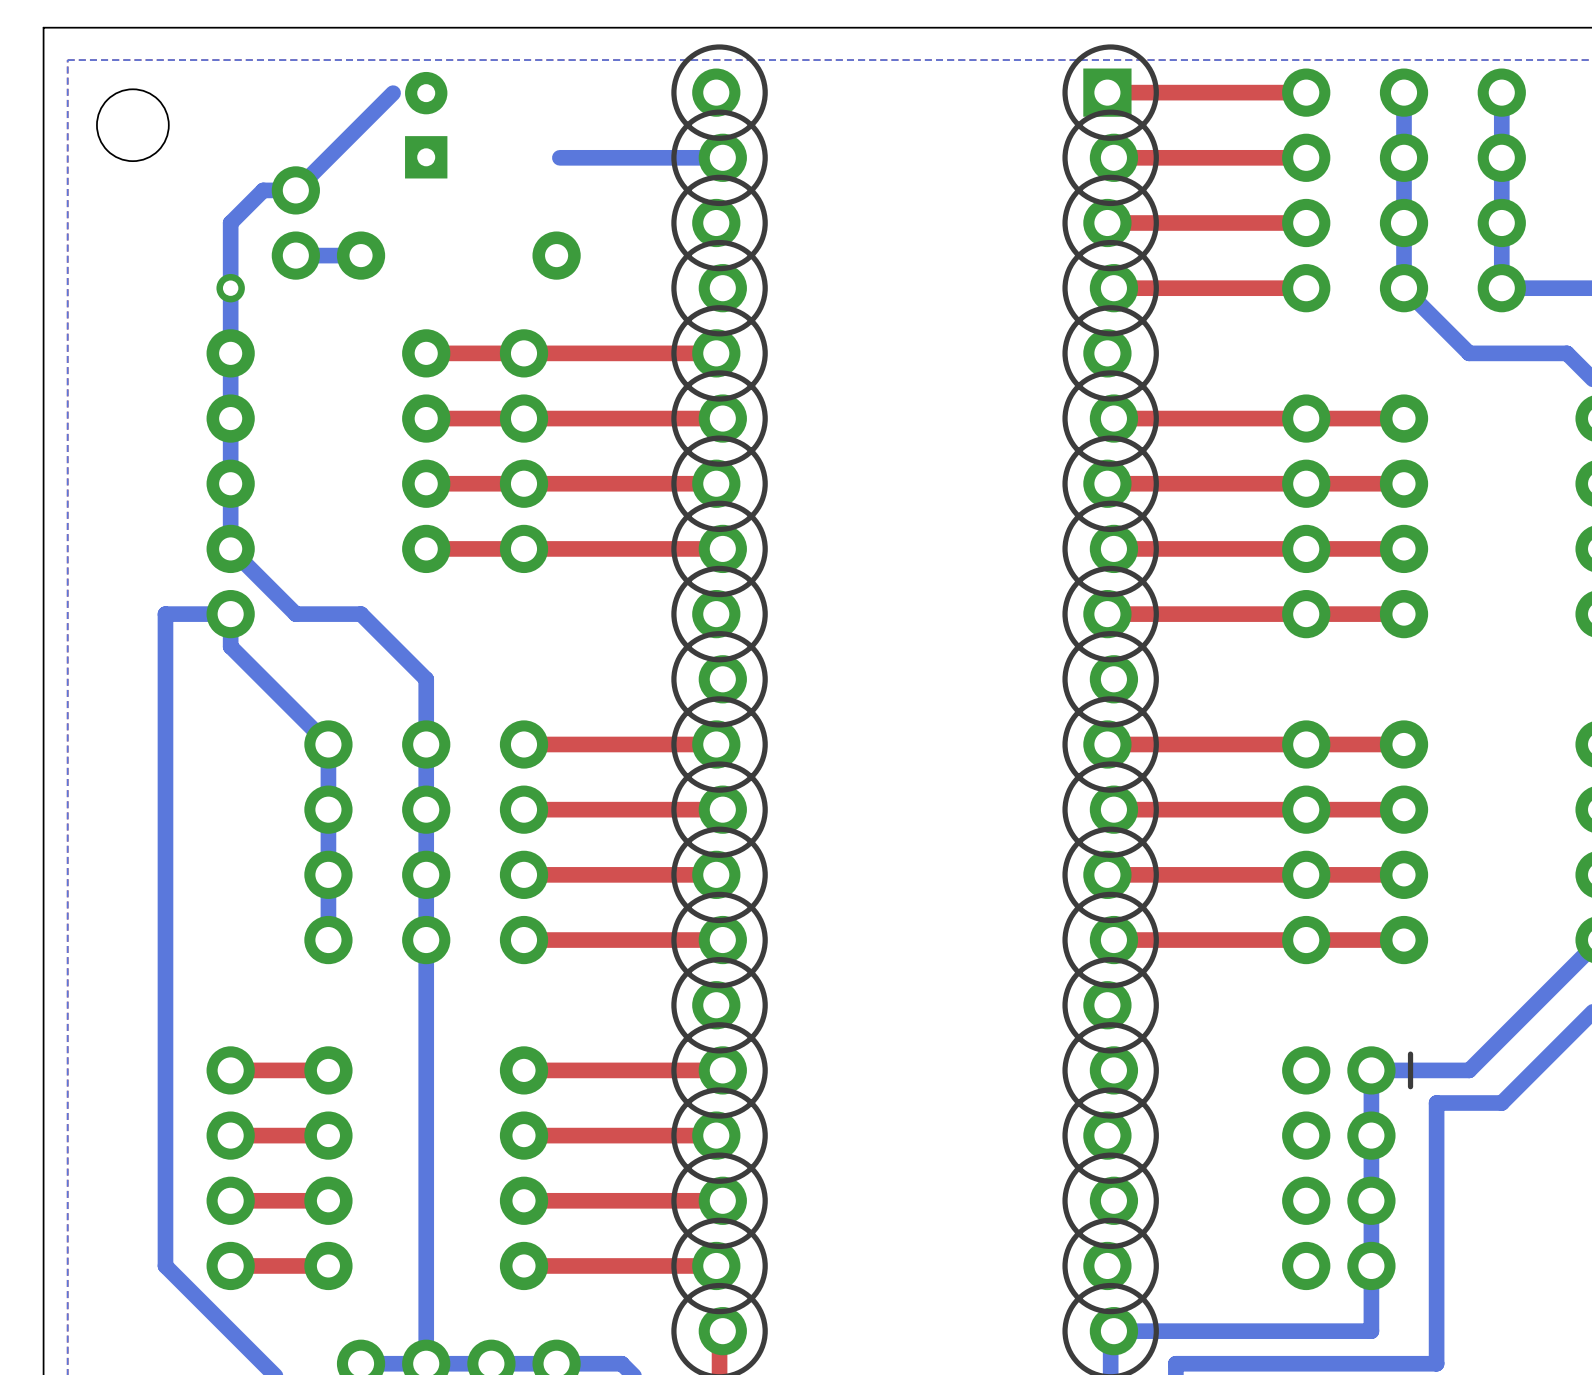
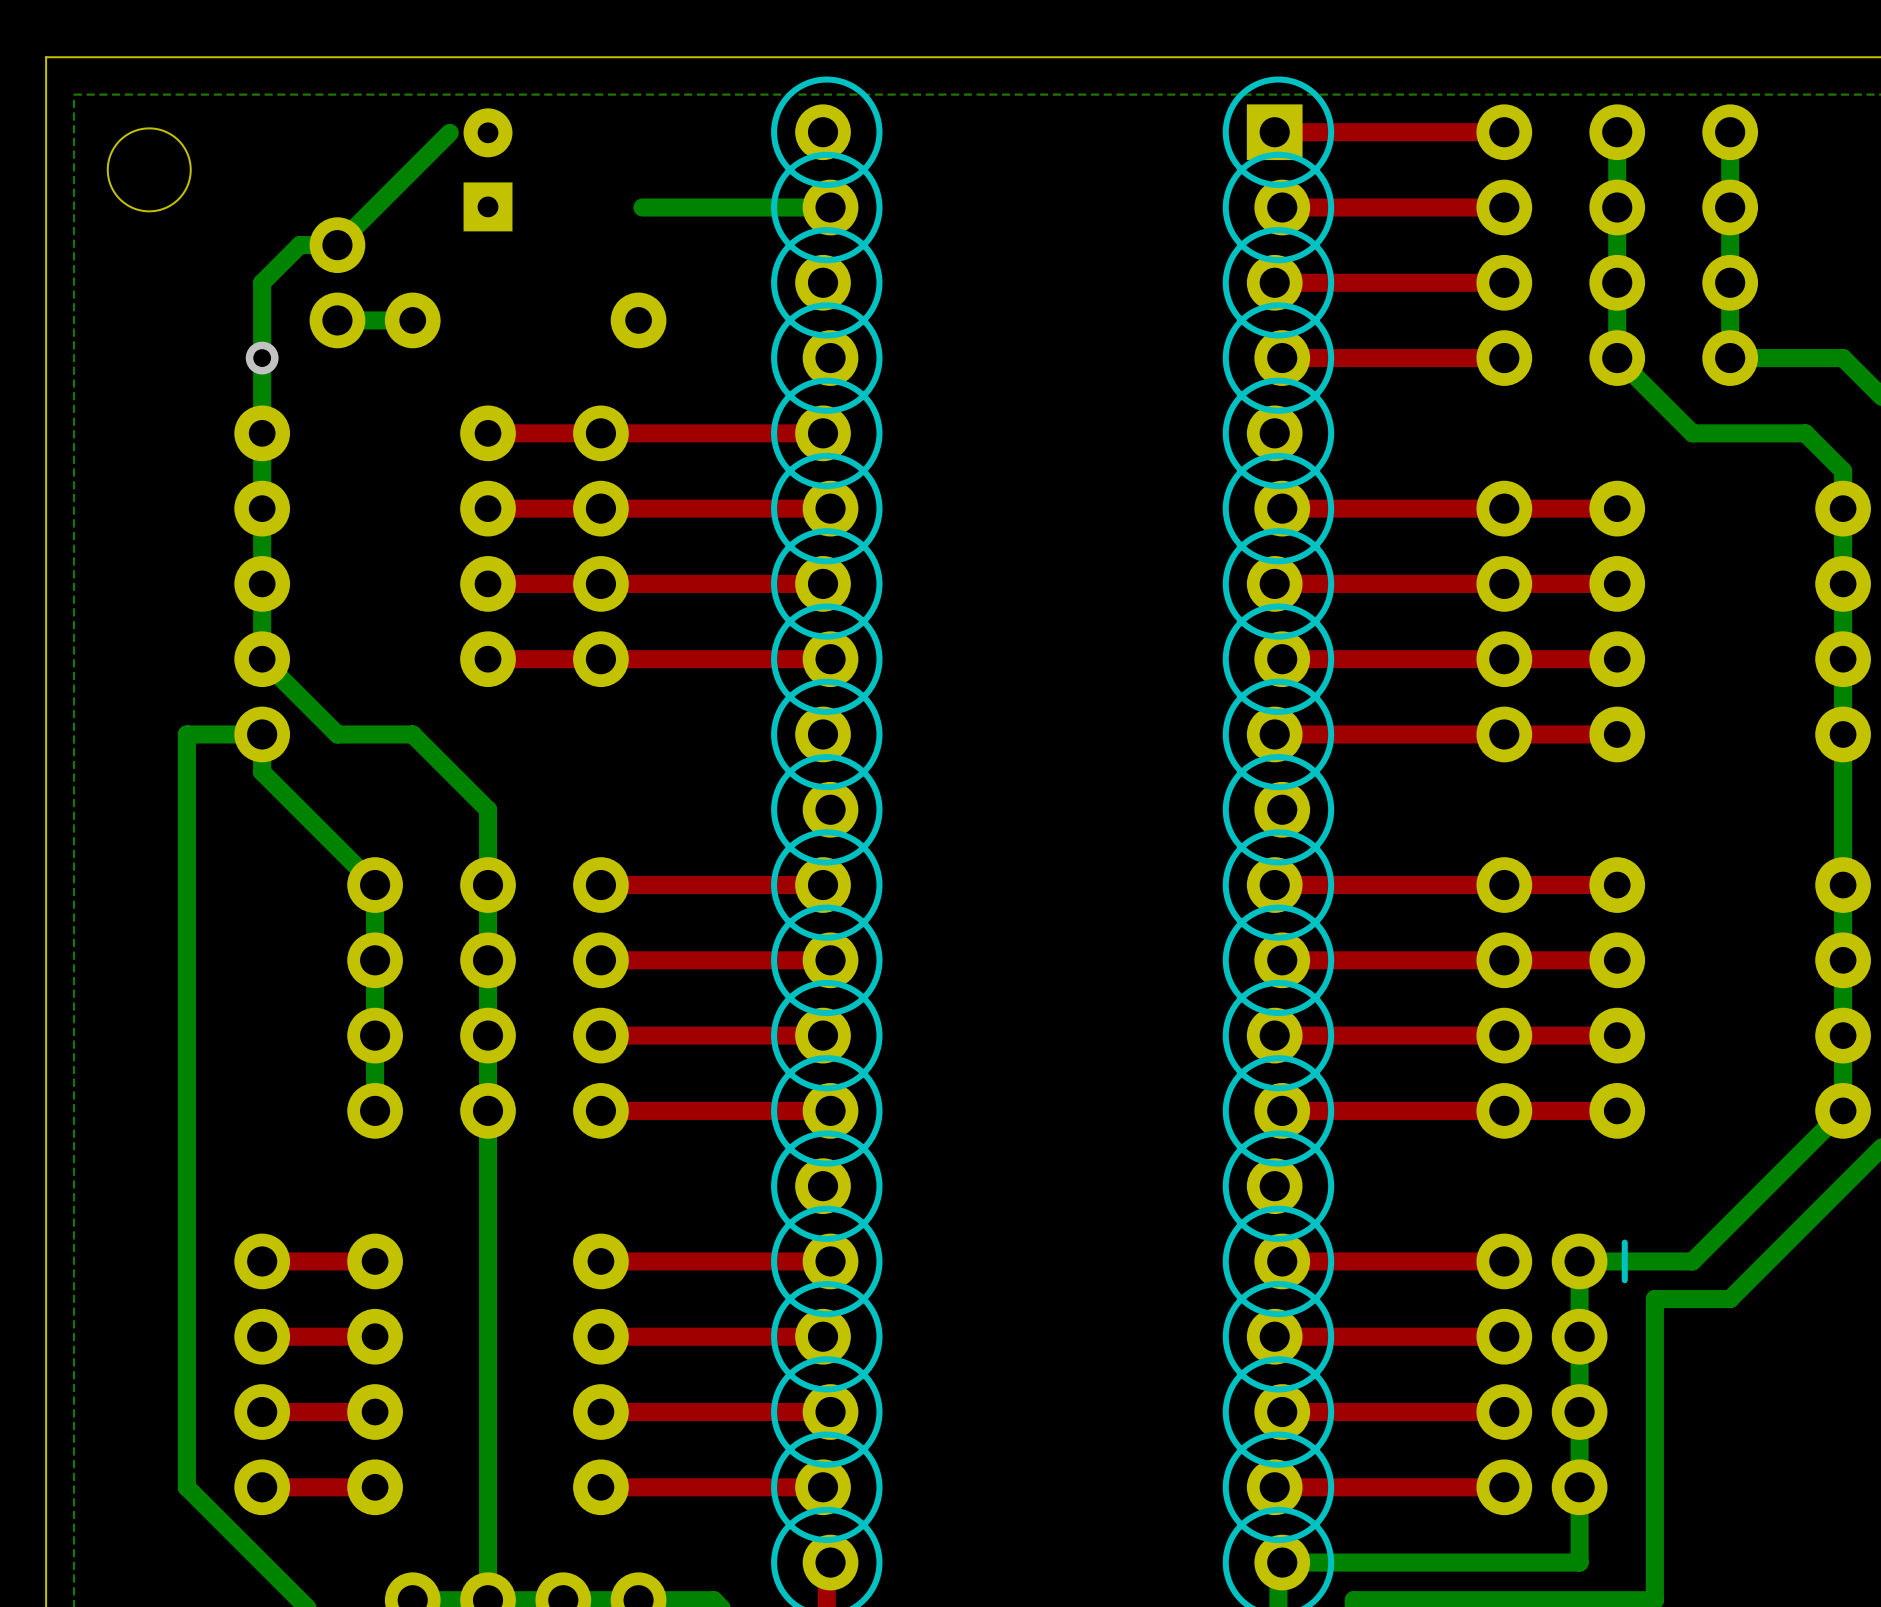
top track: none -> (1504, 1261) (1282, 1261)
top track: none -> (1504, 1336) (1274, 1336)
top track: none -> (1504, 1412) (1282, 1412)
top track: none -> (1504, 1487) (1274, 1487)

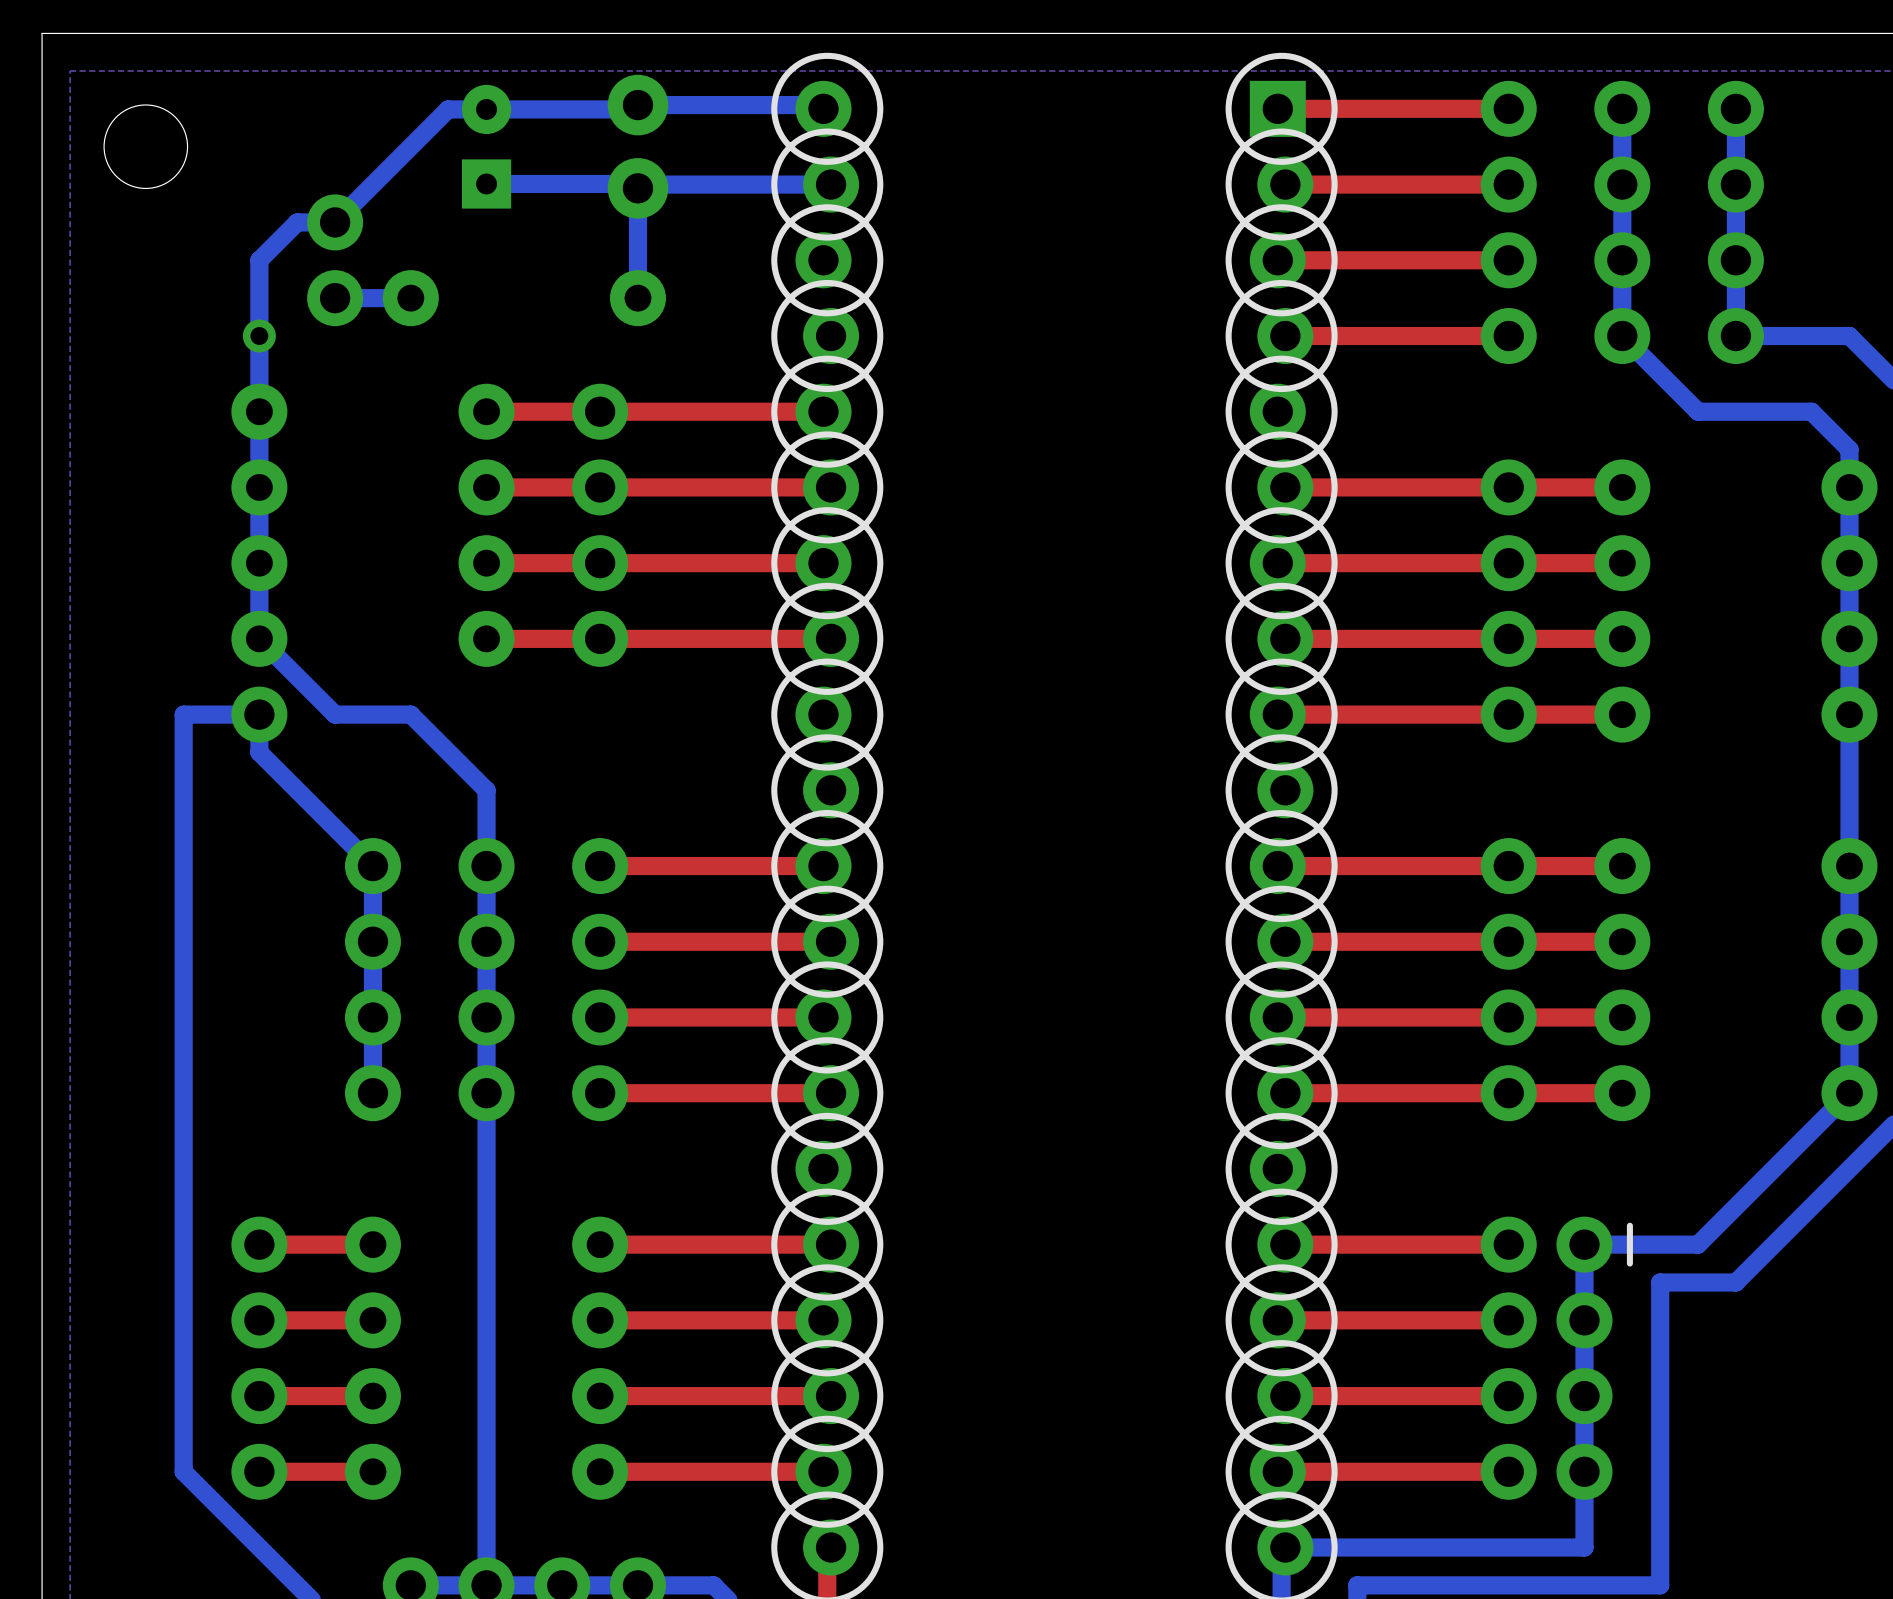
bottom track: none -> (819, 105) (637, 105) (633, 109) (448, 109)
part: none -> (637, 146)
bottom track: none -> (486, 183) (633, 183) (637, 188) (637, 298)

